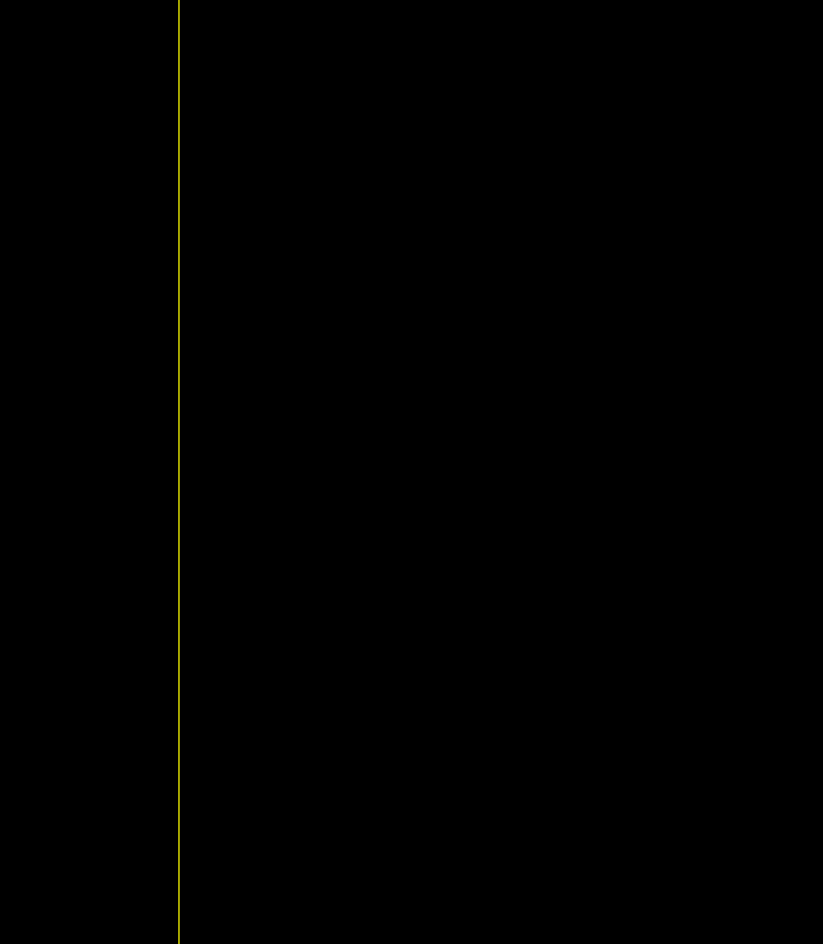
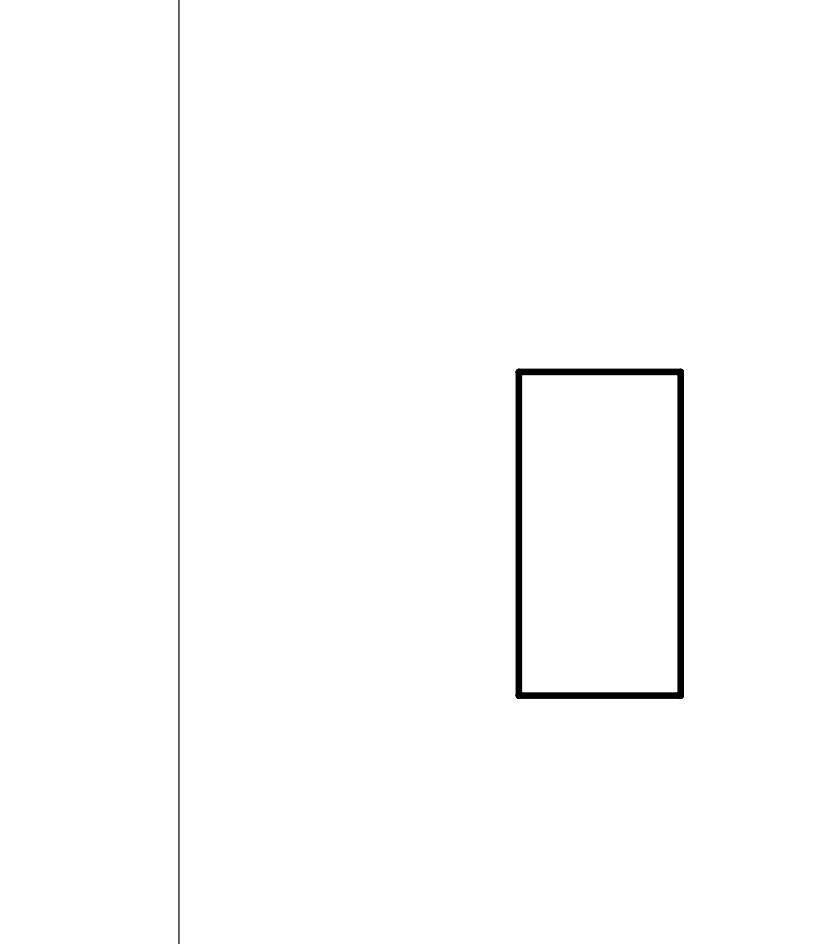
board edge: none -> (680, 371) (518, 371) (518, 695) (680, 695) (680, 371)

